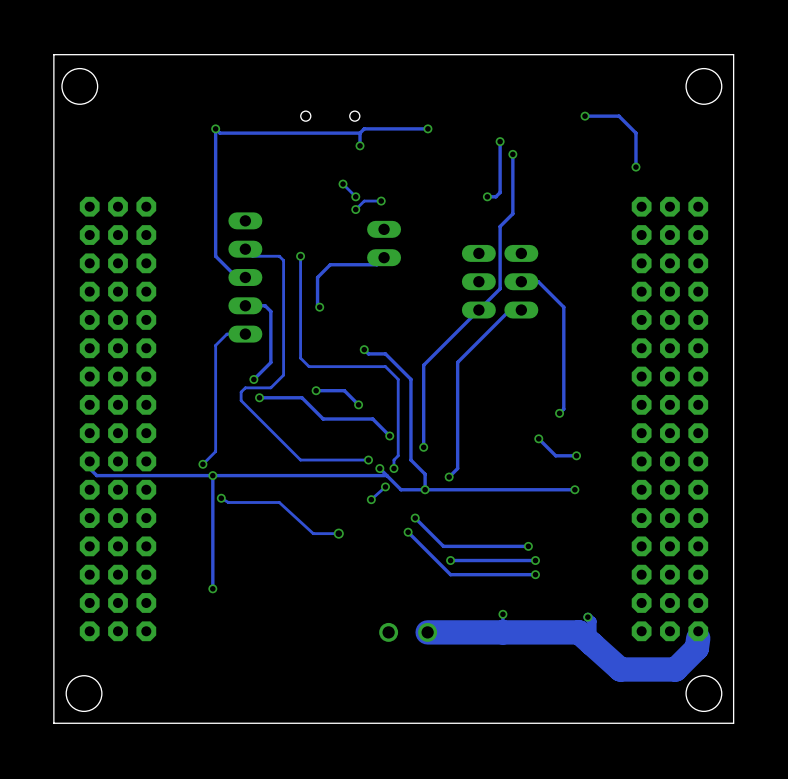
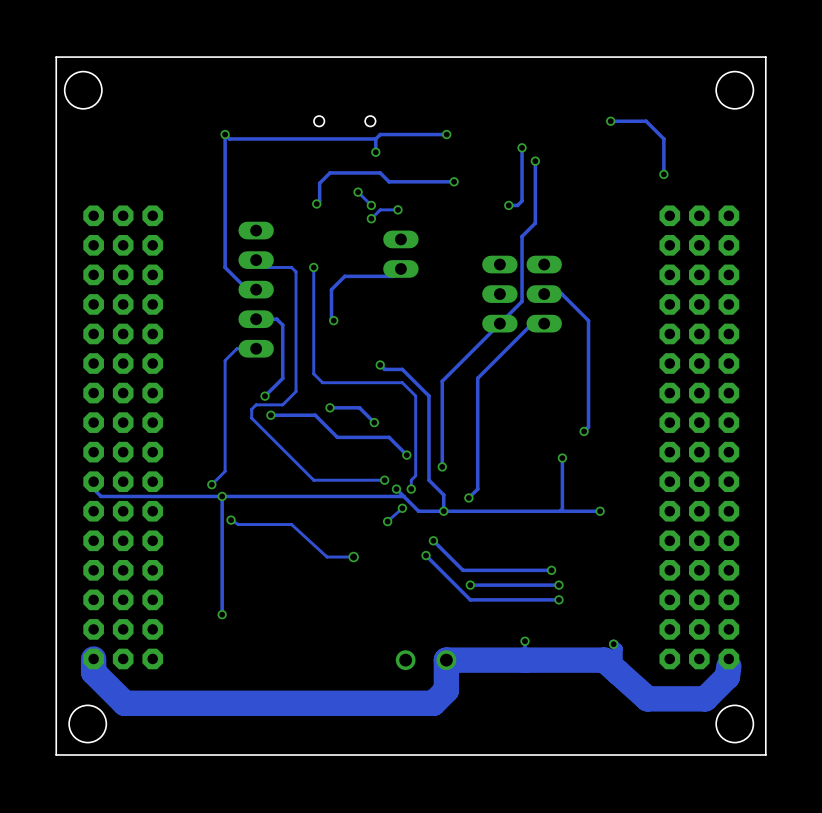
track: none -> (454, 181) (389, 181) (380, 172) (330, 172) (319, 183) (319, 201) (316, 203)
via: none -> (454, 181)
via: none -> (316, 203)
track: (538, 438) (555, 455) (576, 455) -> (562, 458) (562, 509) (560, 511)
via: (576, 455) -> none
track: none -> (93, 658) (93, 672) (124, 703) (433, 703) (446, 690) (446, 660)

